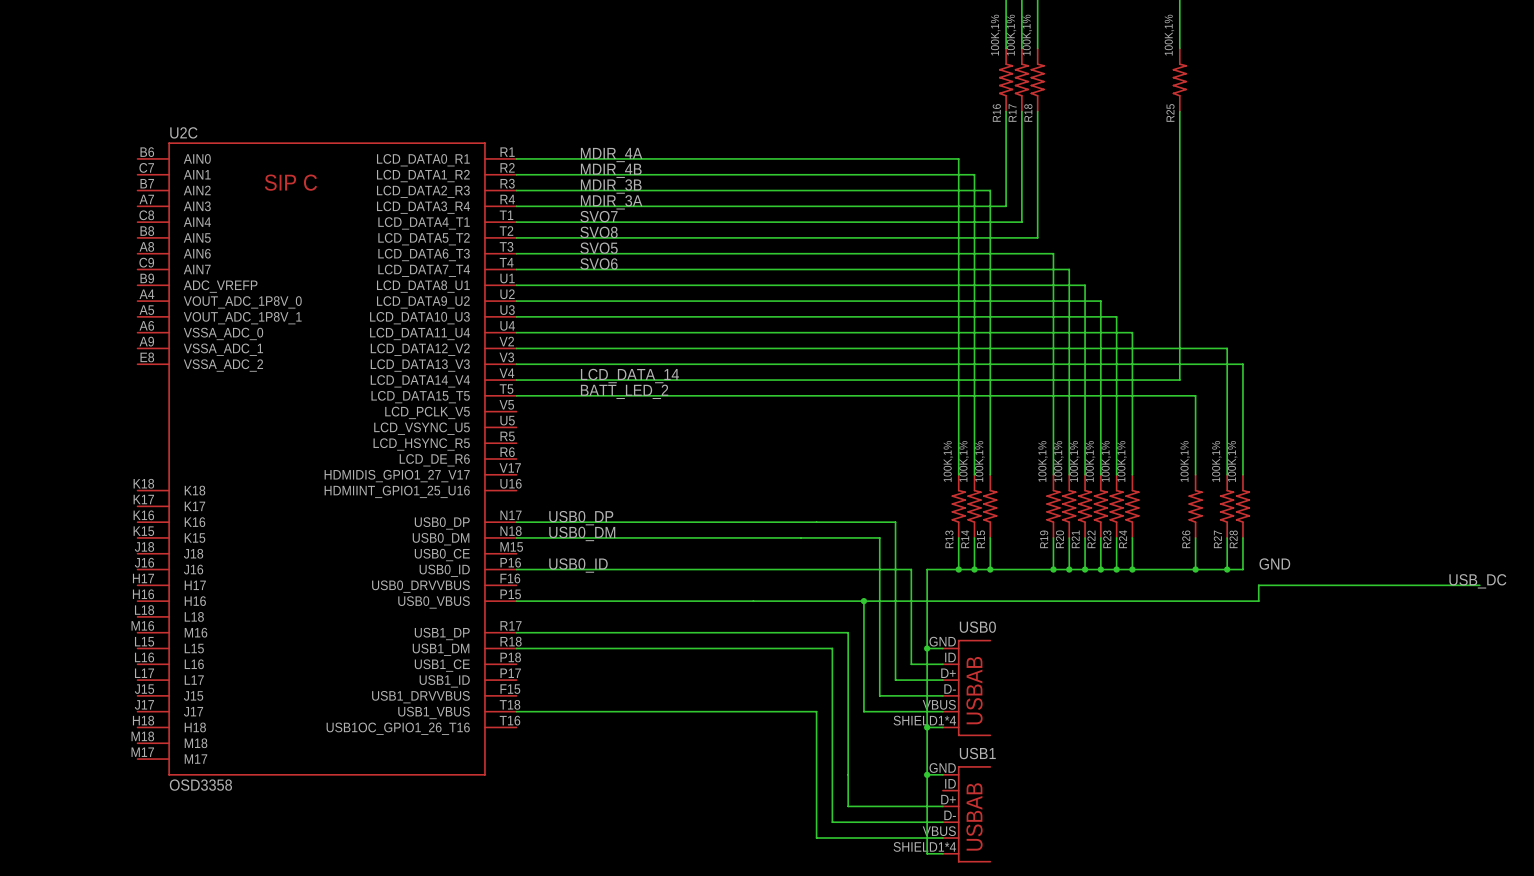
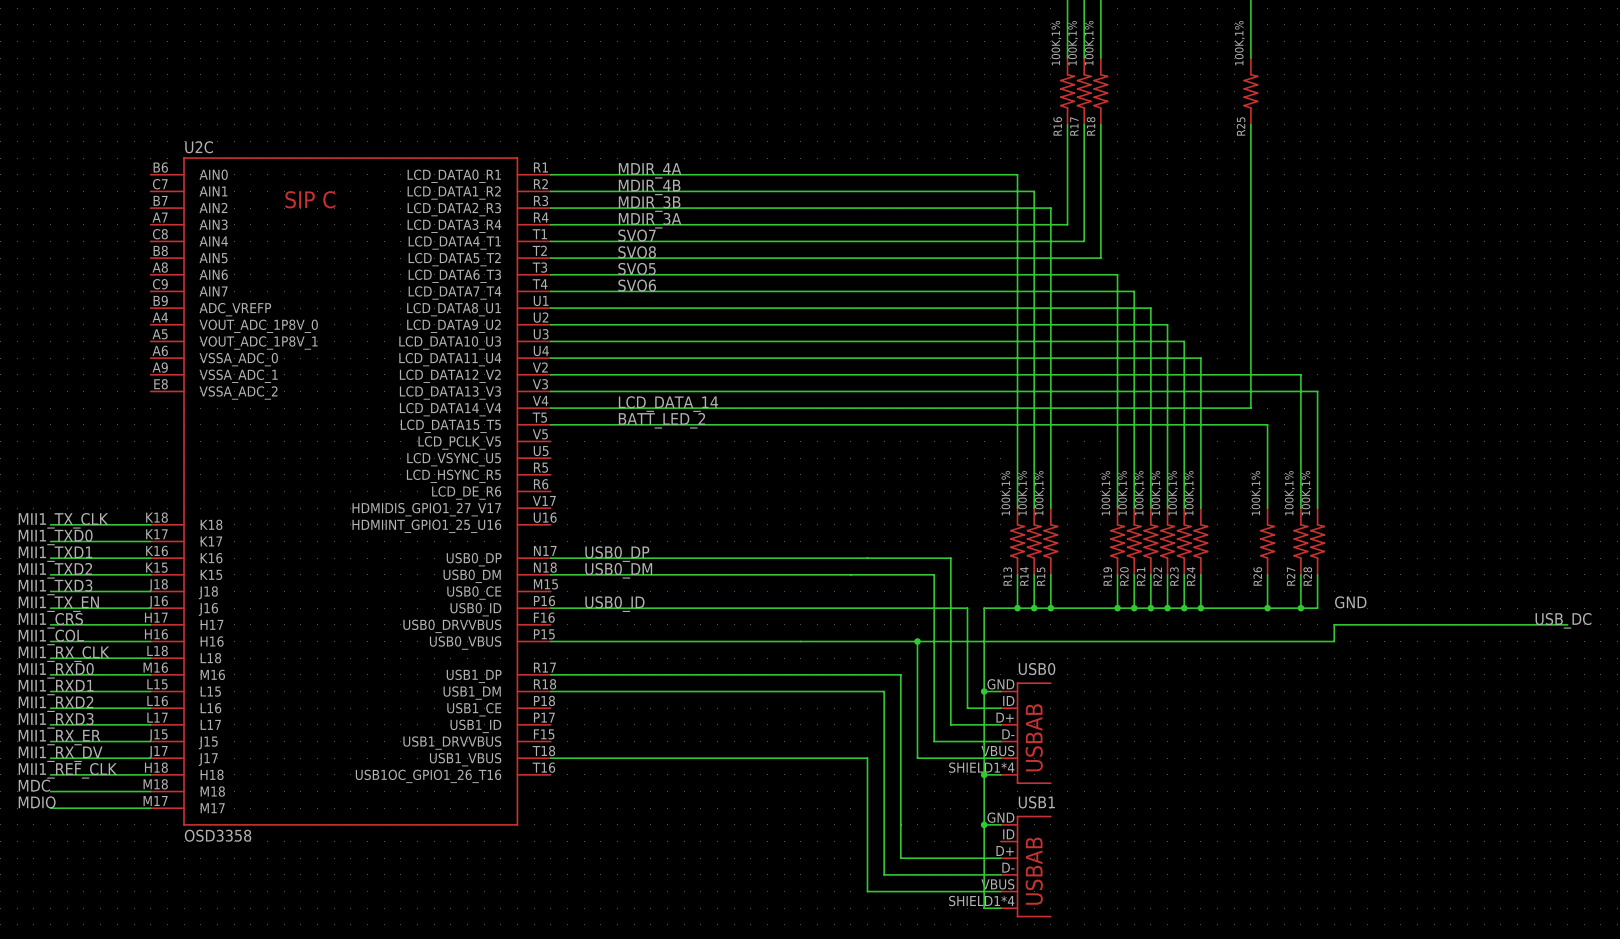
label: none -> MII1_TX_CLK (63, 520)
wire: none -> (50, 524) (150, 524)
label: none -> MII1_TXD0 (55, 537)
wire: none -> (50, 541) (150, 541)
label: none -> MII1_TXD1 (55, 554)
wire: none -> (50, 558) (150, 558)
label: none -> MII1_TXD2 (55, 570)
wire: none -> (50, 574) (150, 574)
label: none -> MII1_TXD3 (55, 587)
wire: none -> (50, 591) (150, 591)
label: none -> MII1_TX_EN (58, 604)
wire: none -> (50, 608) (150, 608)
label: none -> MII1_CRS (50, 620)
wire: none -> (50, 624) (150, 624)
label: none -> MII1_COL (51, 637)
wire: none -> (50, 641) (150, 641)
label: none -> MII1_RX_CLK (64, 654)
wire: none -> (50, 658) (150, 658)
label: none -> MII1_RXD0 (56, 670)
wire: none -> (50, 674) (150, 674)
label: none -> MII1_RXD1 (56, 687)
wire: none -> (50, 691) (150, 691)
label: none -> MII1_RXD2 (56, 704)
wire: none -> (50, 708) (150, 708)
label: none -> MII1_RXD3 (56, 720)
wire: none -> (50, 724) (150, 724)
label: none -> MII1_RX_ER (59, 737)
wire: none -> (50, 741) (150, 741)
label: none -> MII1_RX_DV (60, 754)
wire: none -> (50, 758) (150, 758)
label: none -> MII1_REF_CLK (67, 770)
wire: none -> (50, 774) (150, 774)
label: none -> MDC (34, 785)
wire: none -> (50, 791) (150, 791)
label: none -> MDIO (37, 802)
wire: none -> (50, 808) (150, 808)

